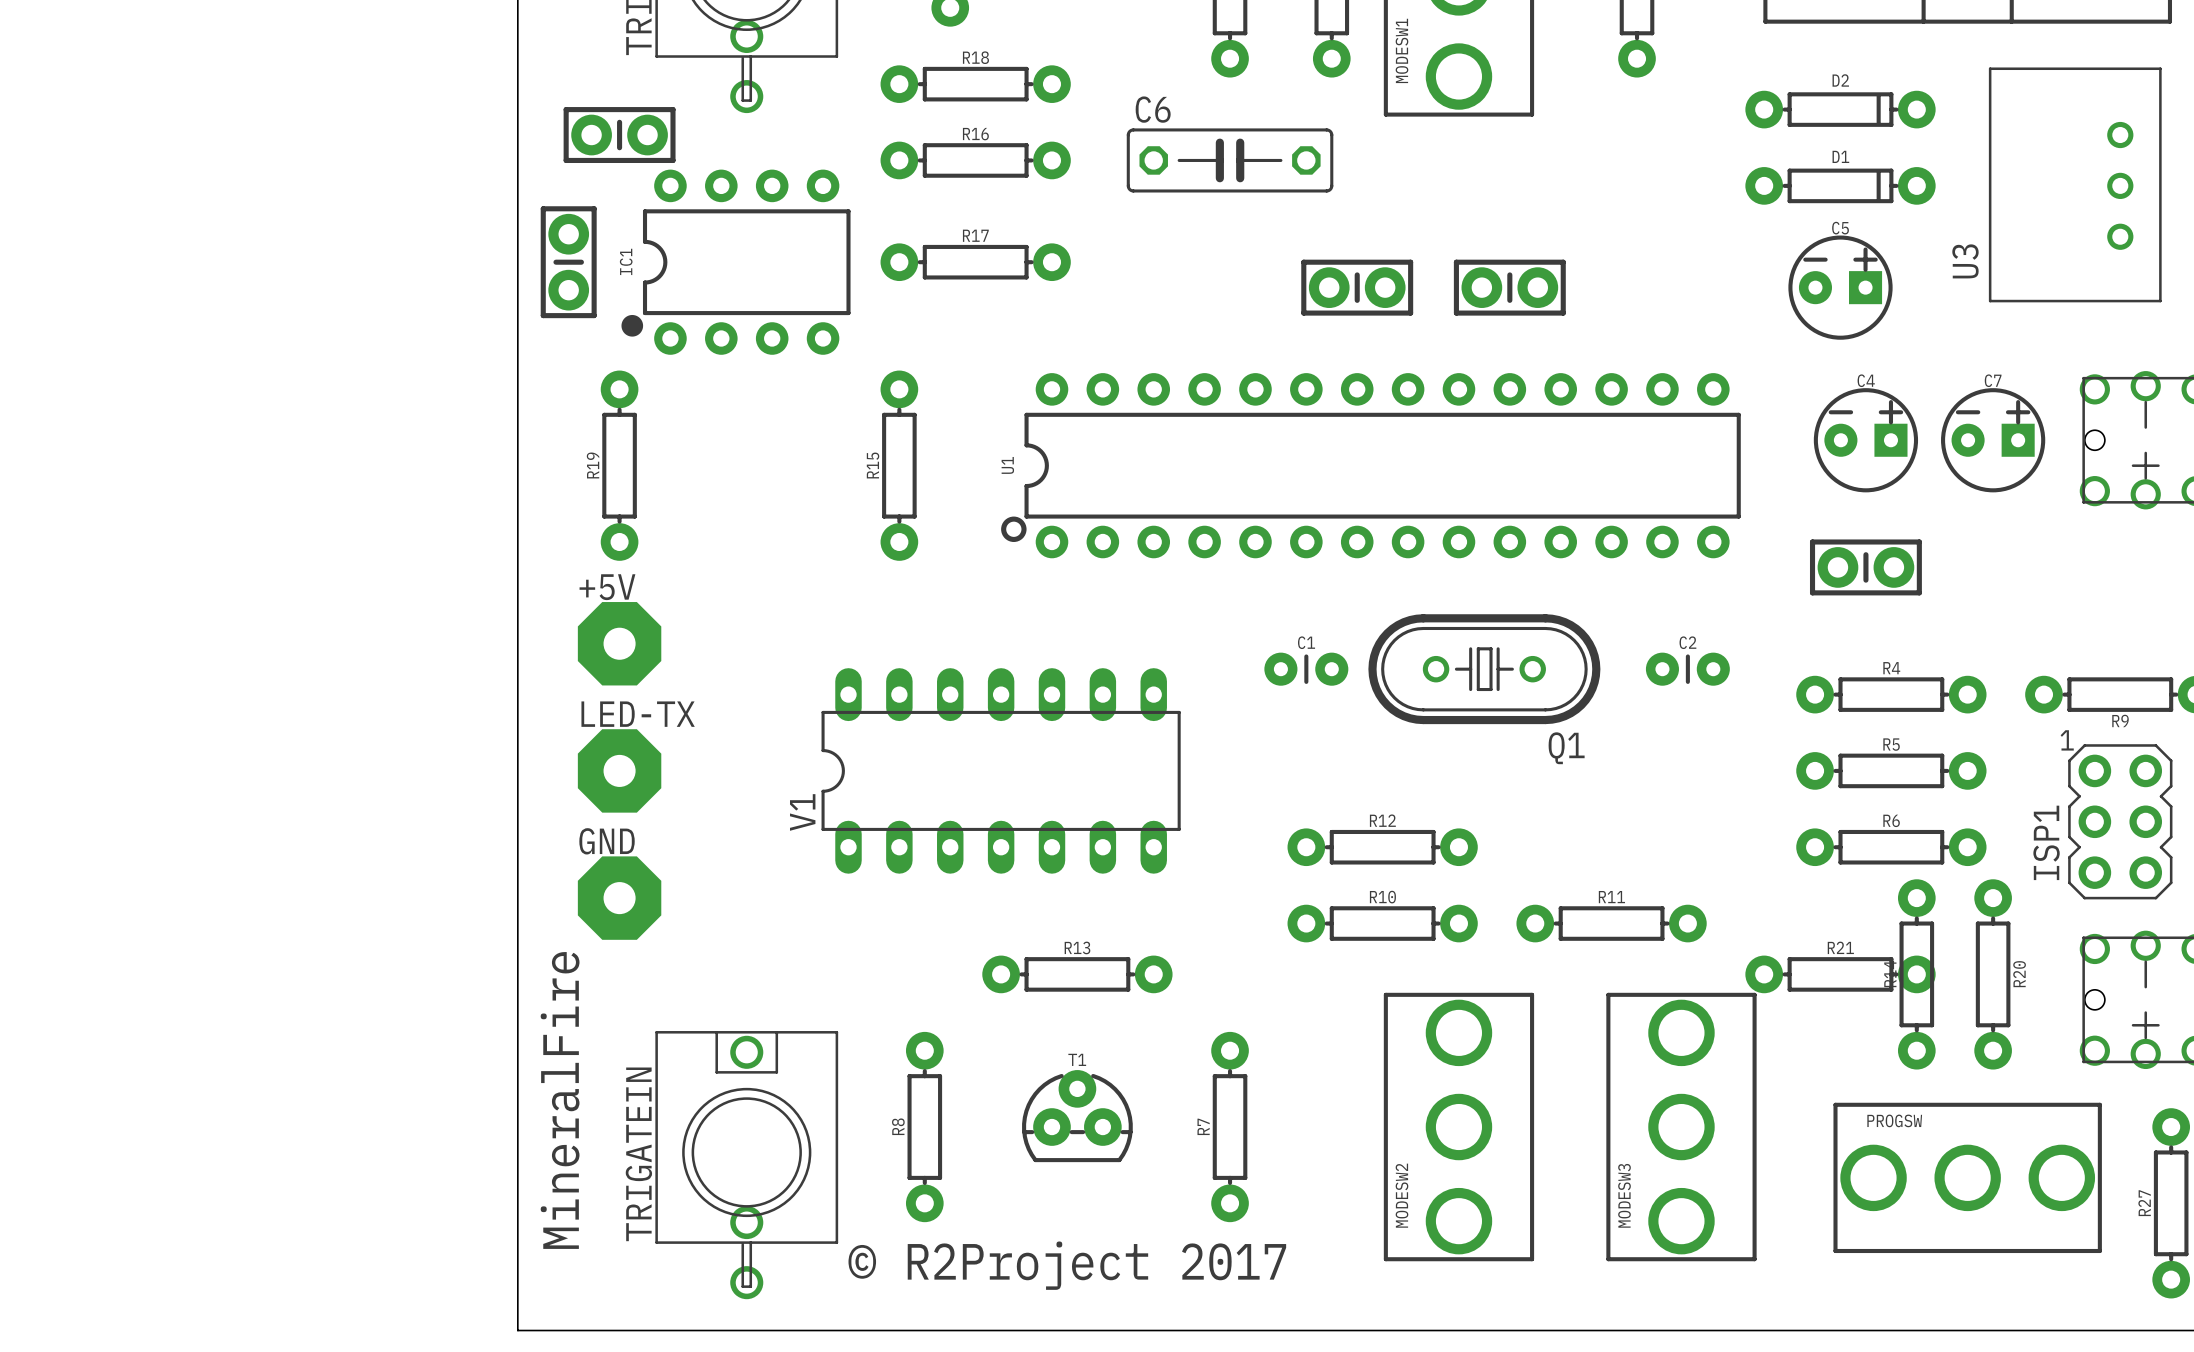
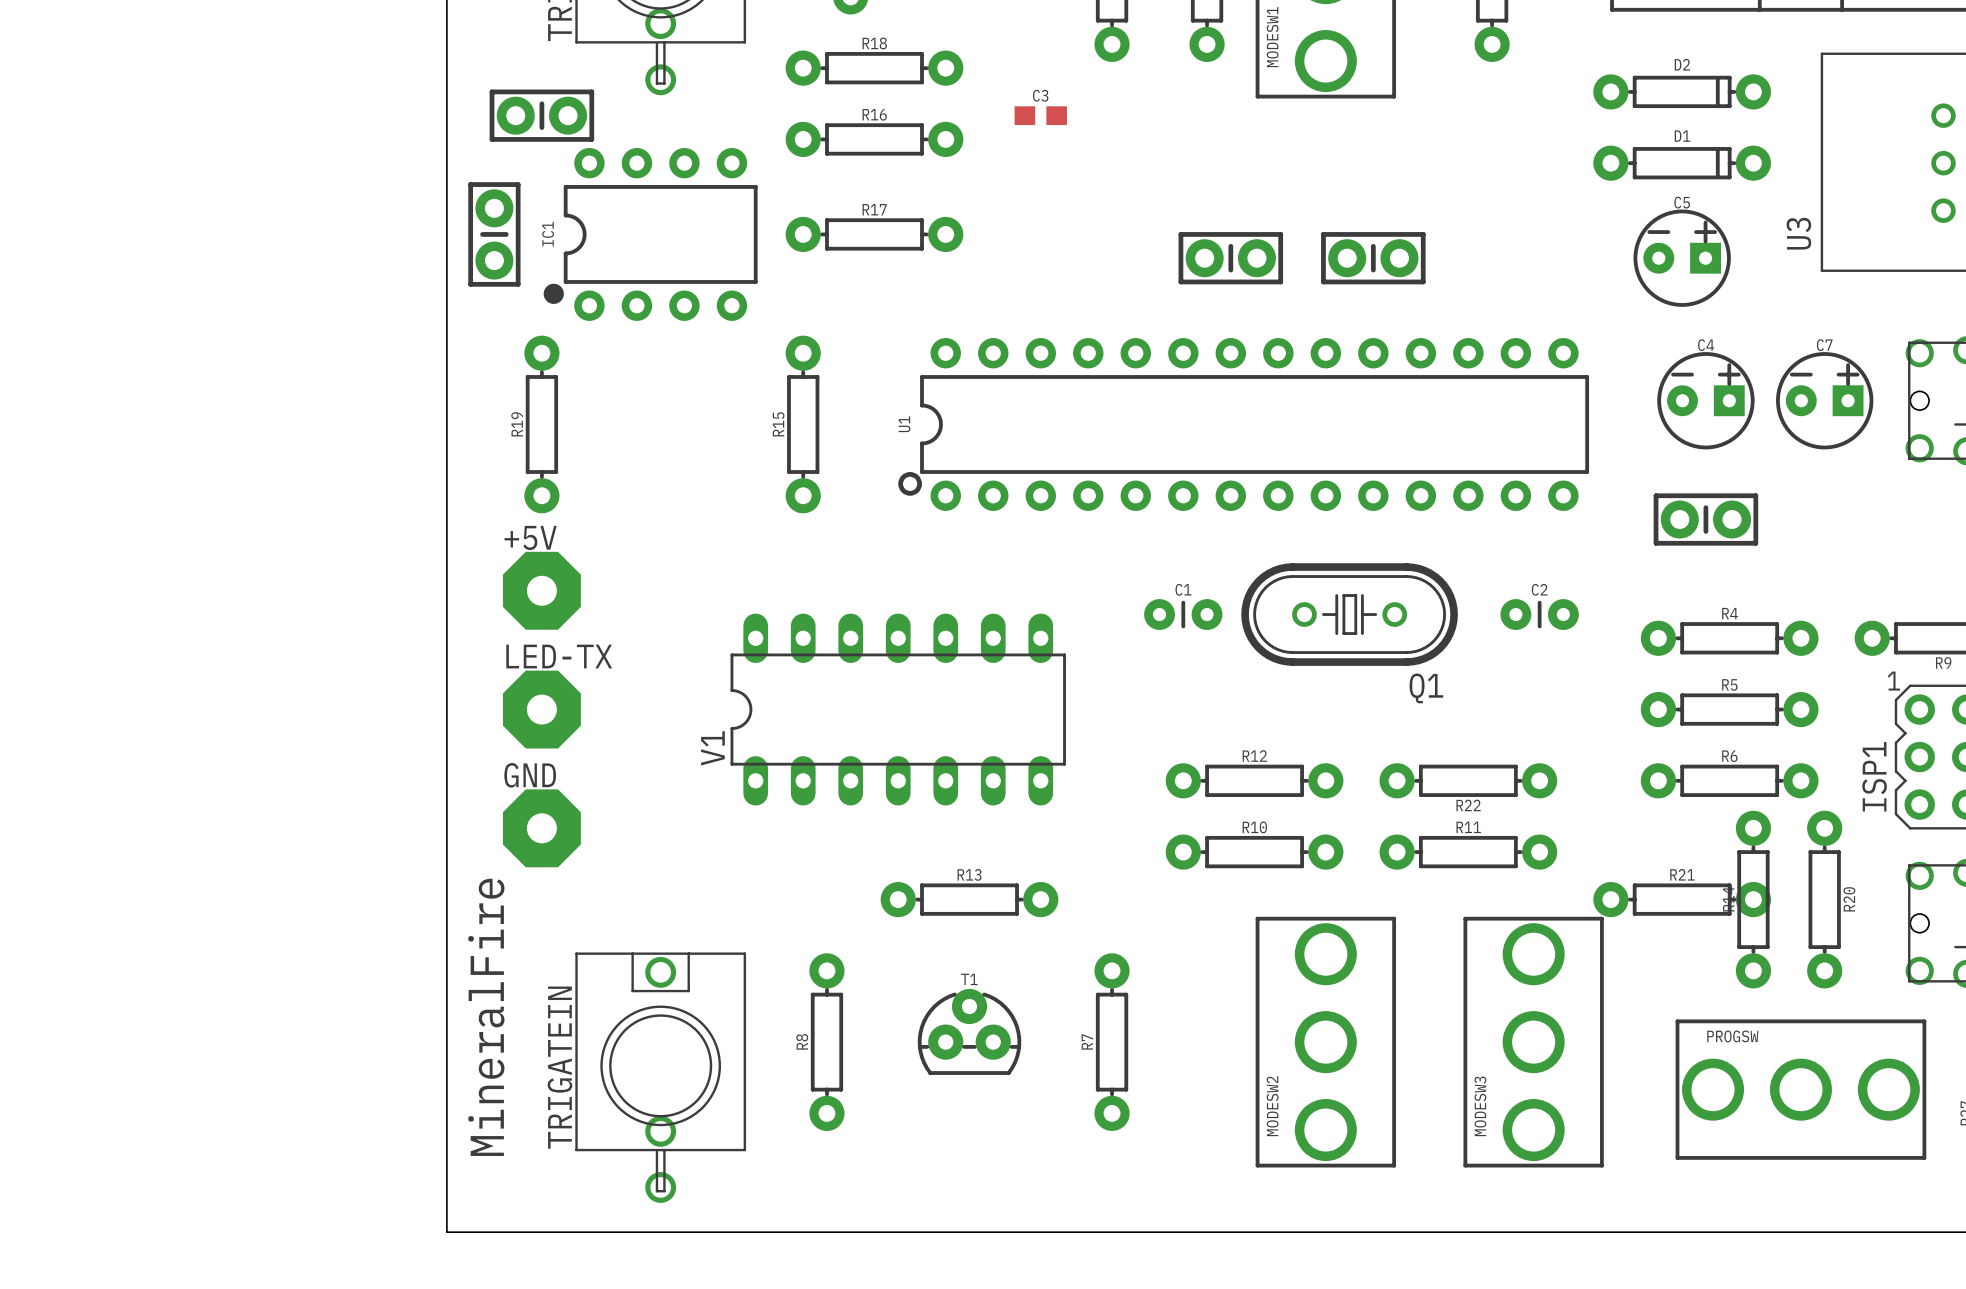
C3: none -> (1040, 115)
C6: (1230, 160) -> none
R22: none -> (1468, 780)
text: © R2Project 2017 (1067, 1265) -> none

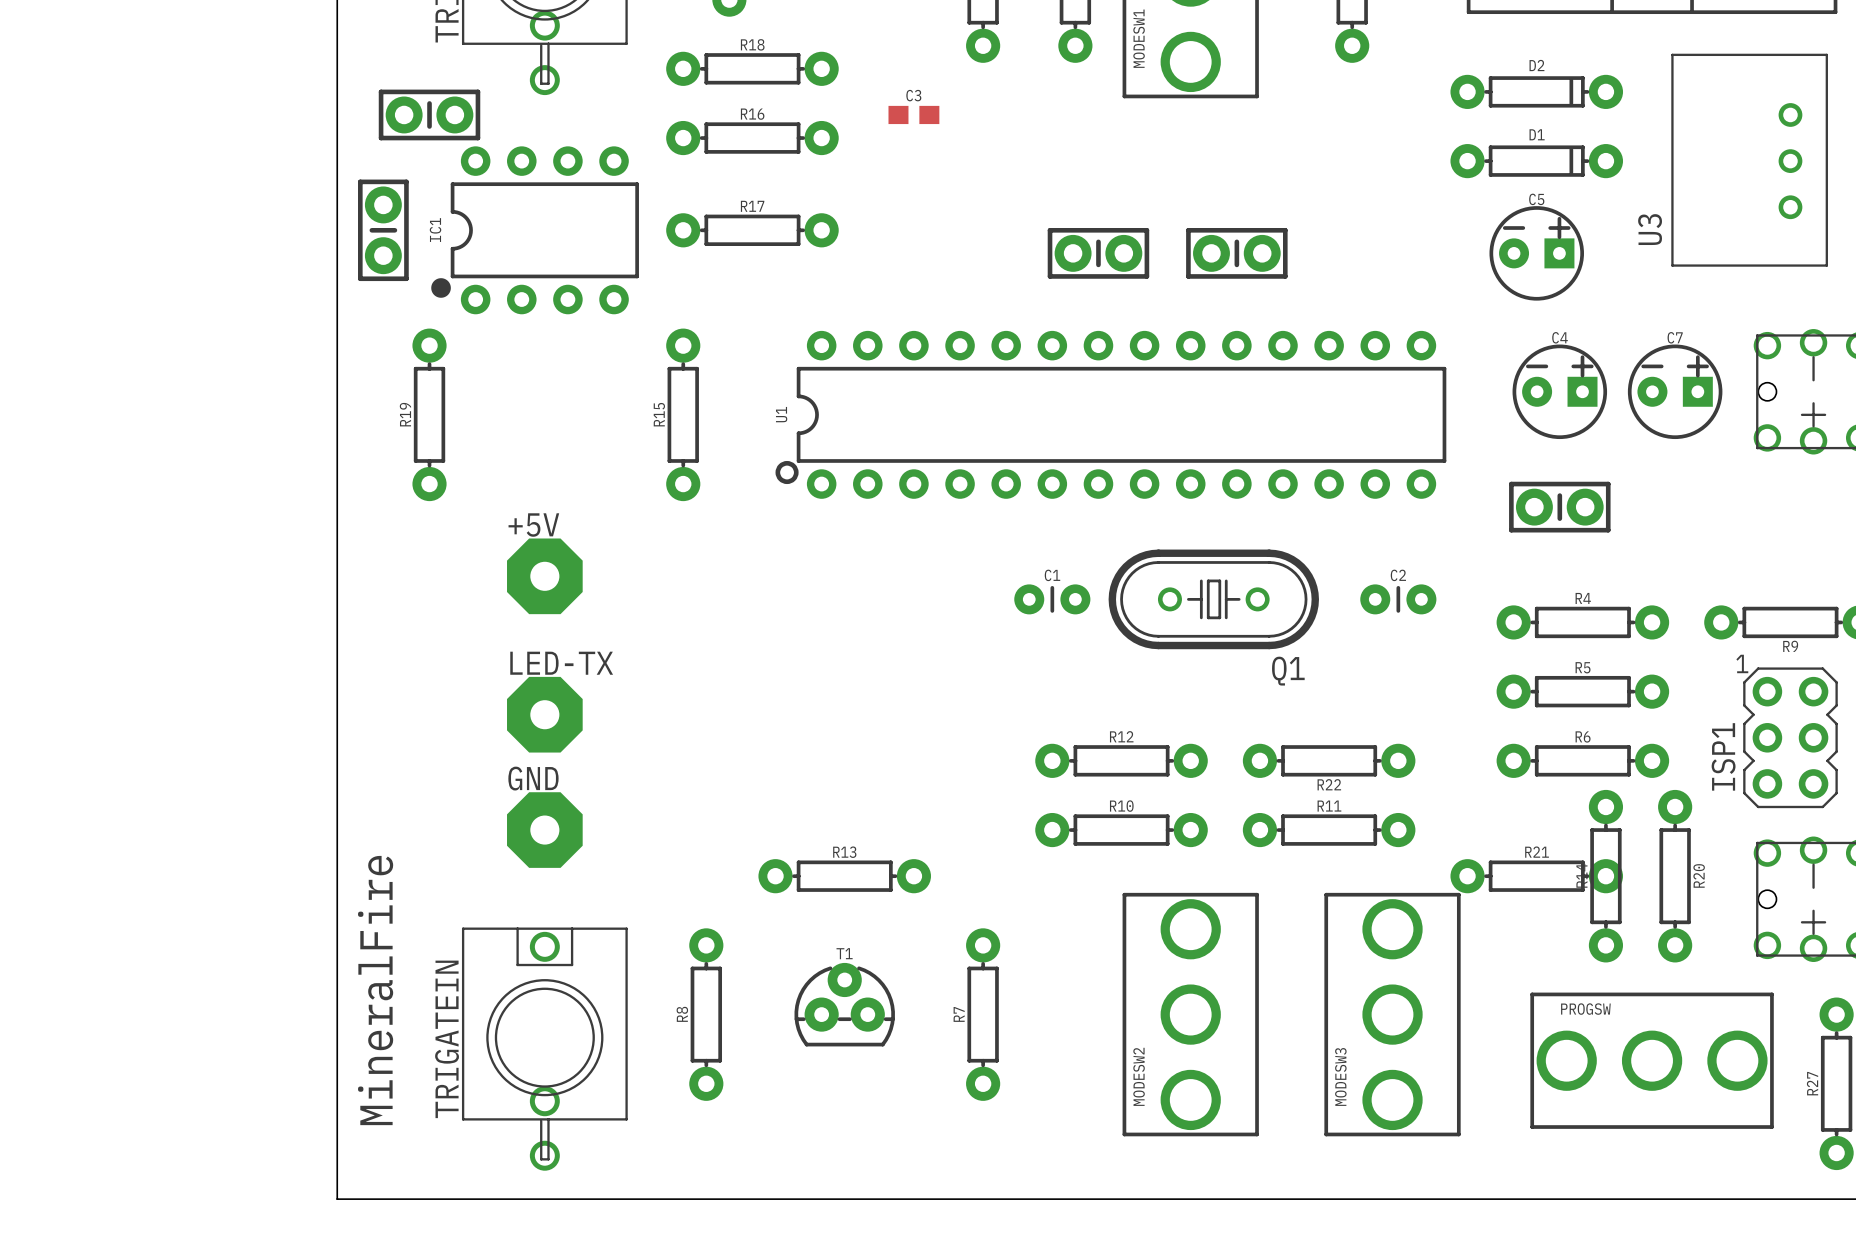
+5V position: (541, 590) -> (544, 576)
LED-TX position: (541, 709) -> (544, 714)
V1: (898, 709) -> none
GND position: (541, 828) -> (544, 830)

